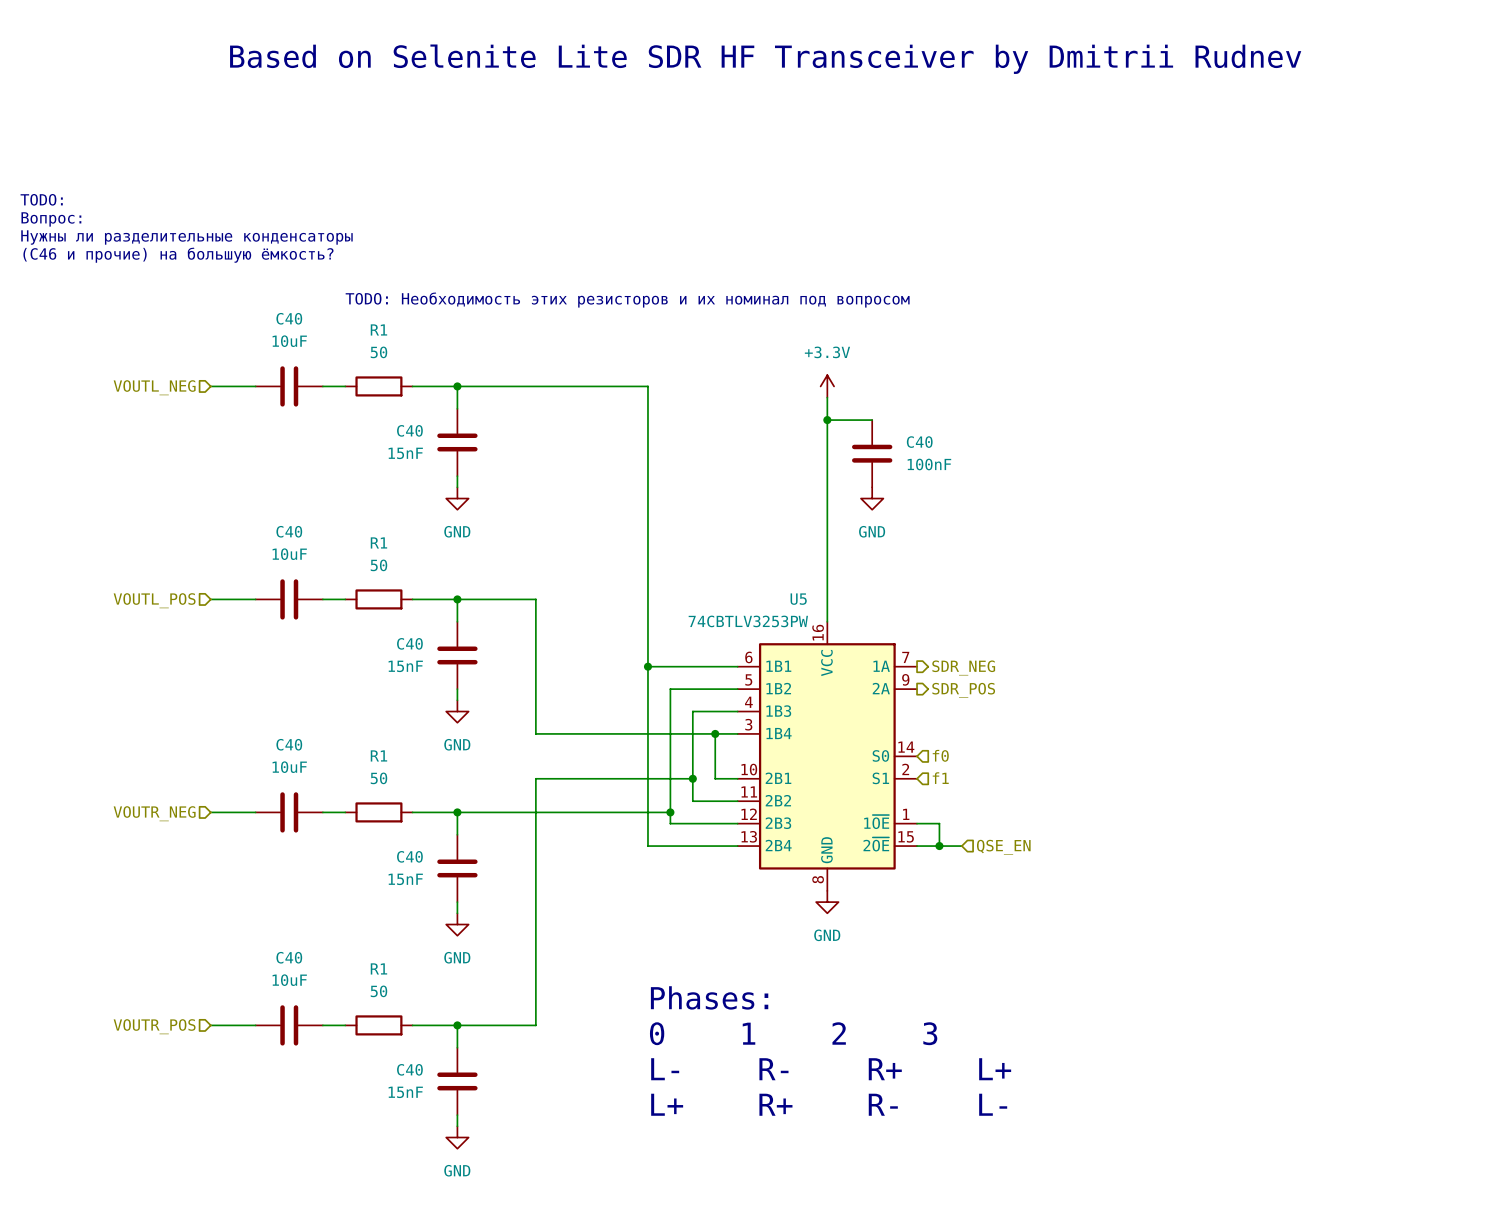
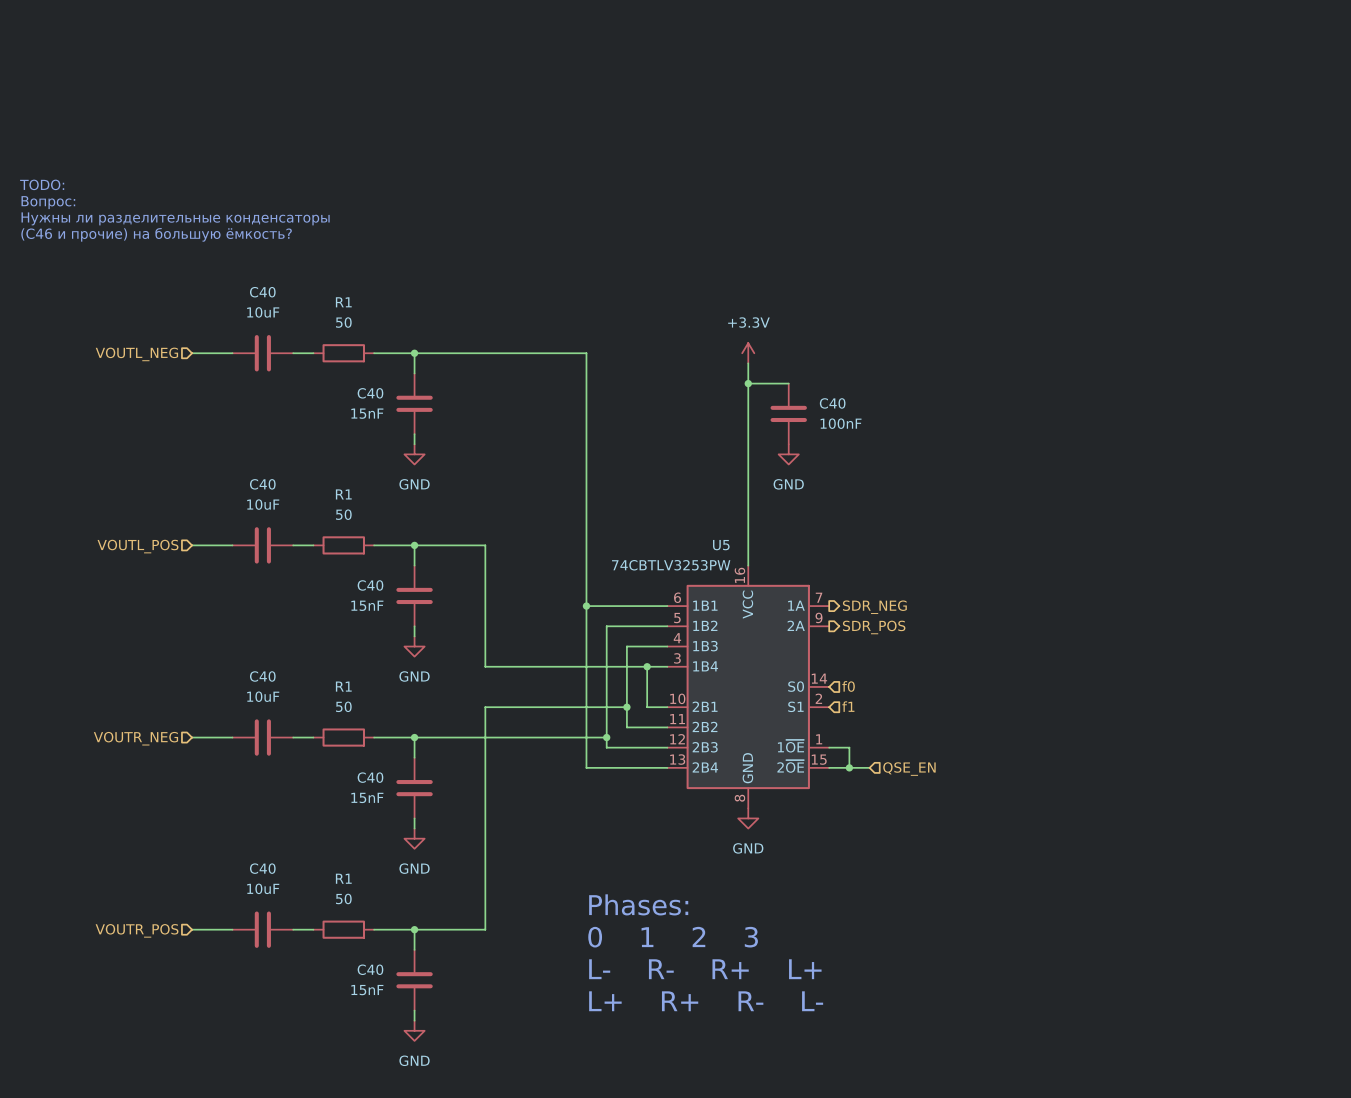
text: Based on Selenite Lite SDR HF Transceiver by Dmitrii Rudnev (765, 59) -> none
text: TODO: Необходимость этих резисторов и их номинал под вопросом (627, 300) -> none

